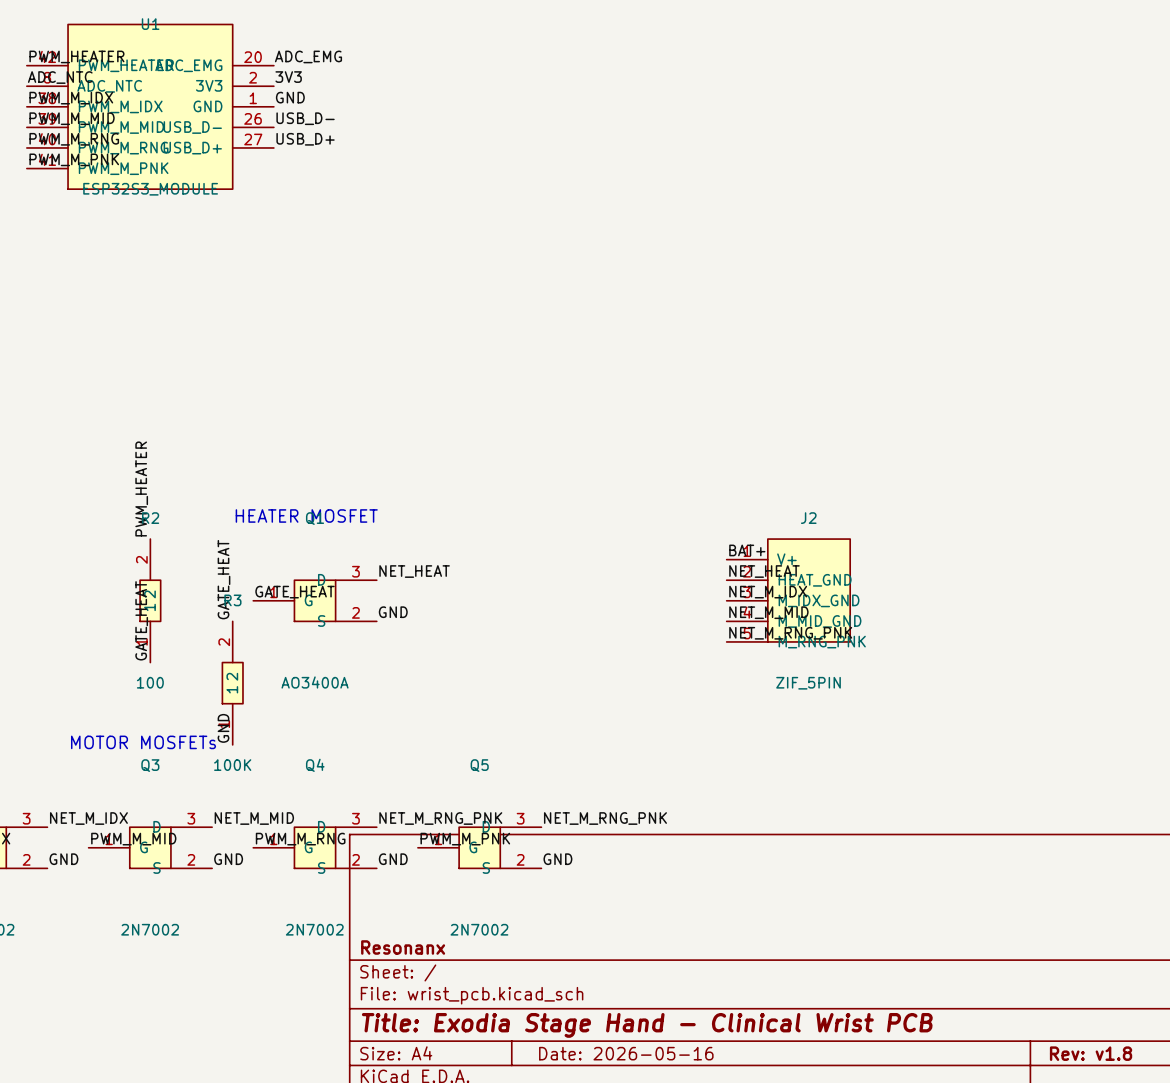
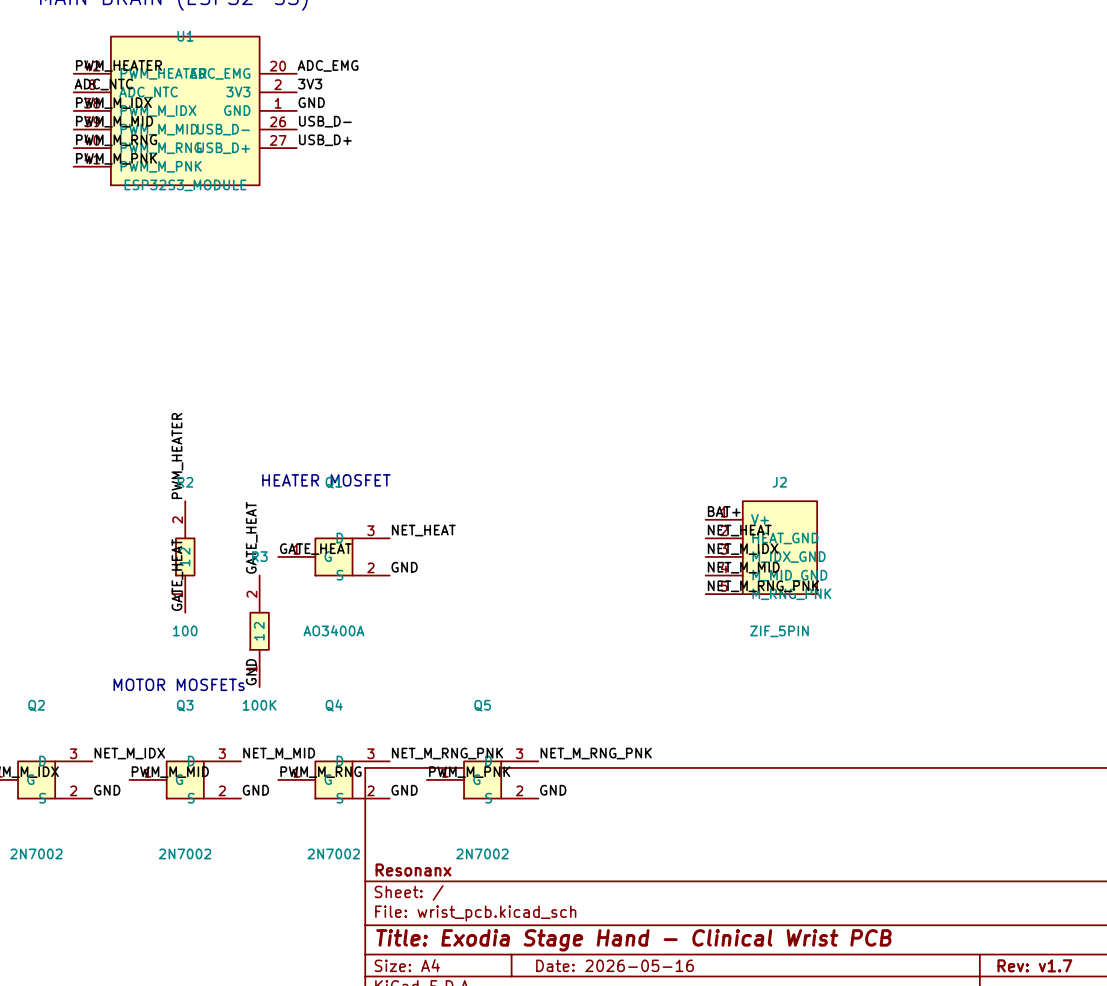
title block: Rev: v1.8 (1091, 1053) -> Rev: v1.7 (1034, 965)

